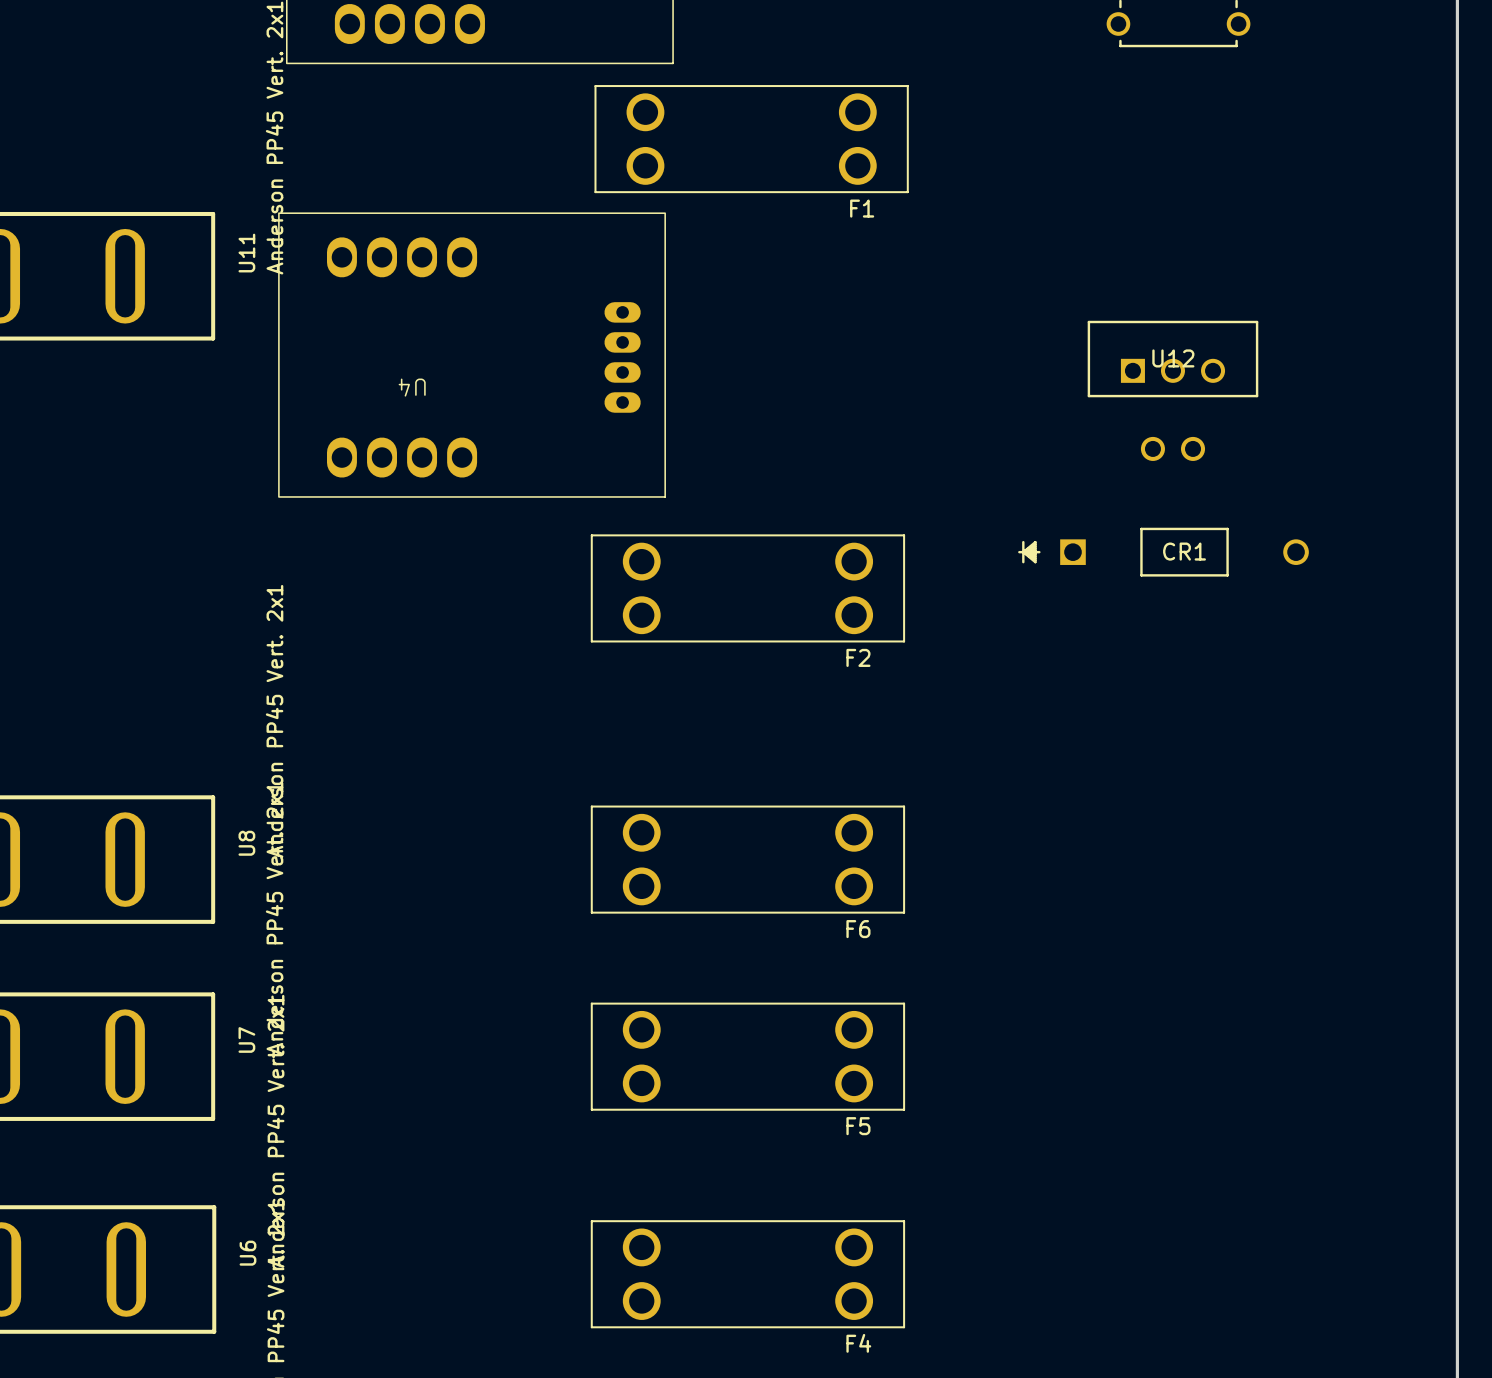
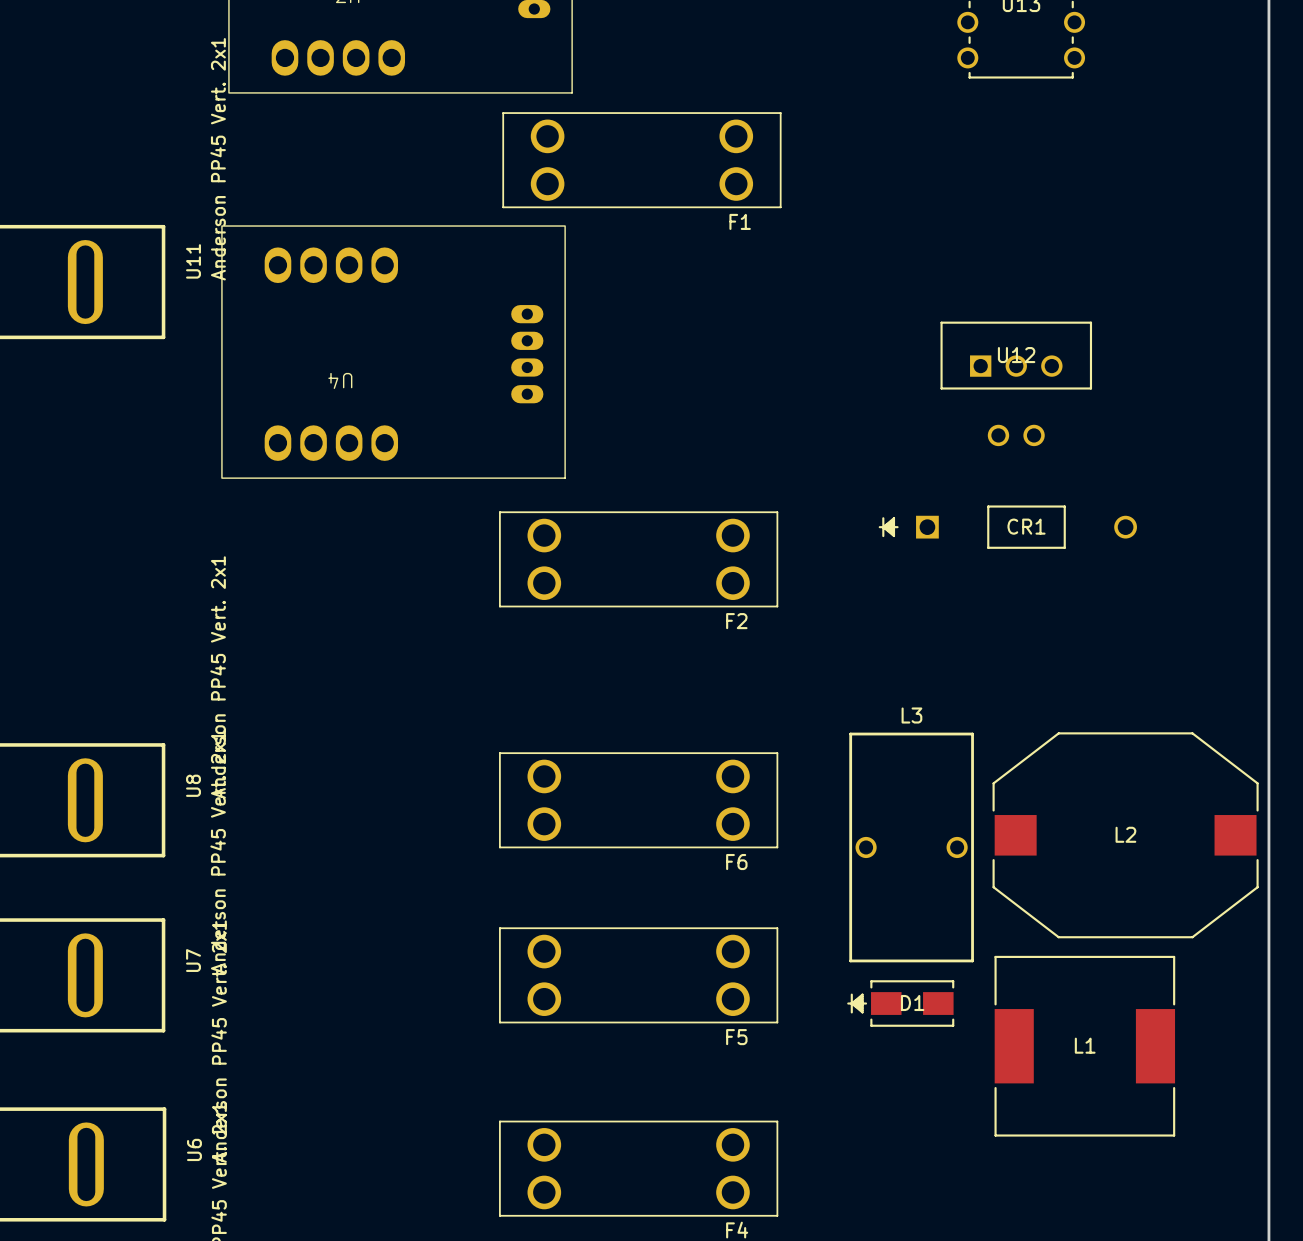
L2: none -> (1125, 835)
L3: none -> (911, 847)
D1: none -> (900, 1003)
L1: none -> (1084, 1046)

